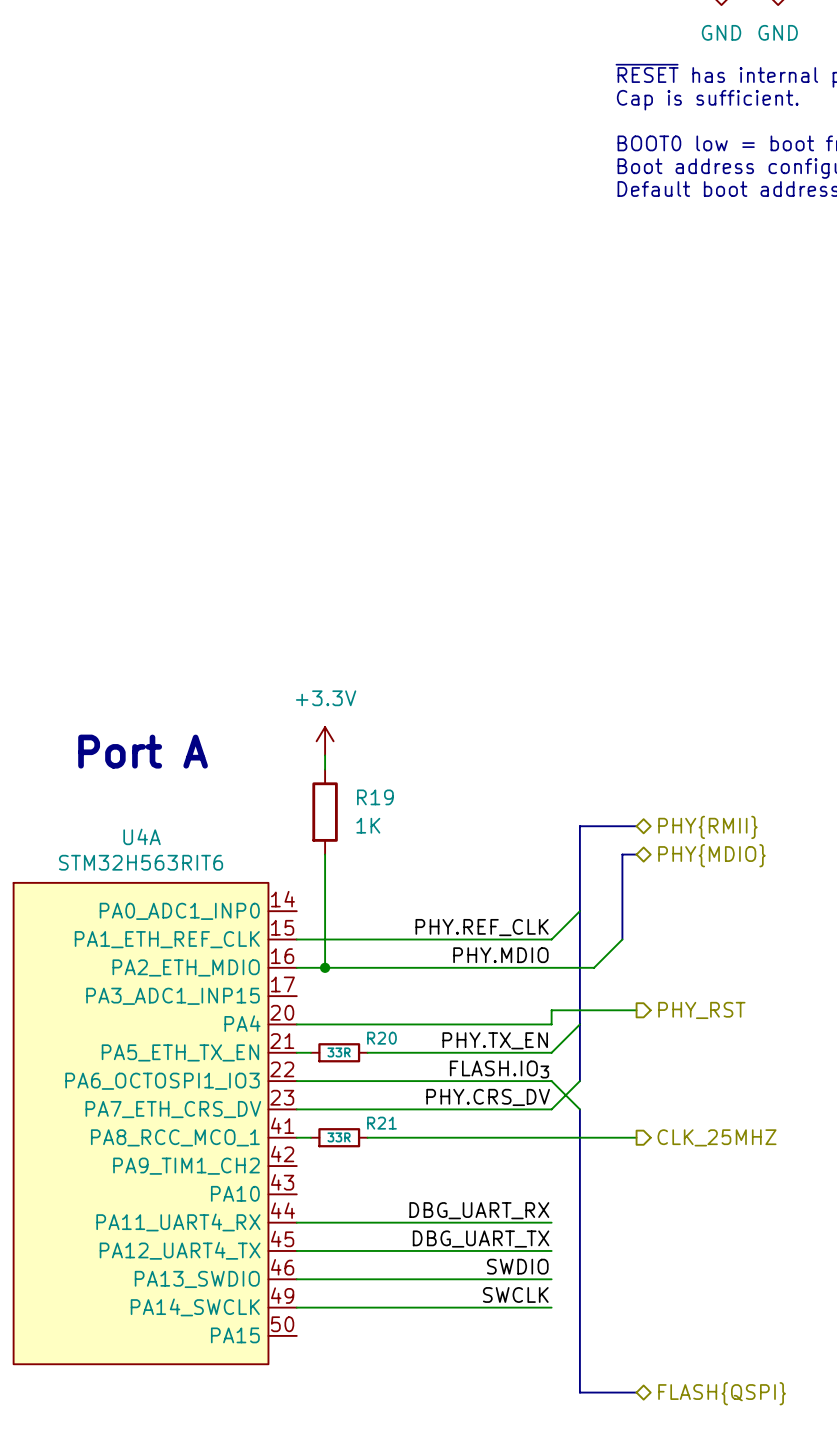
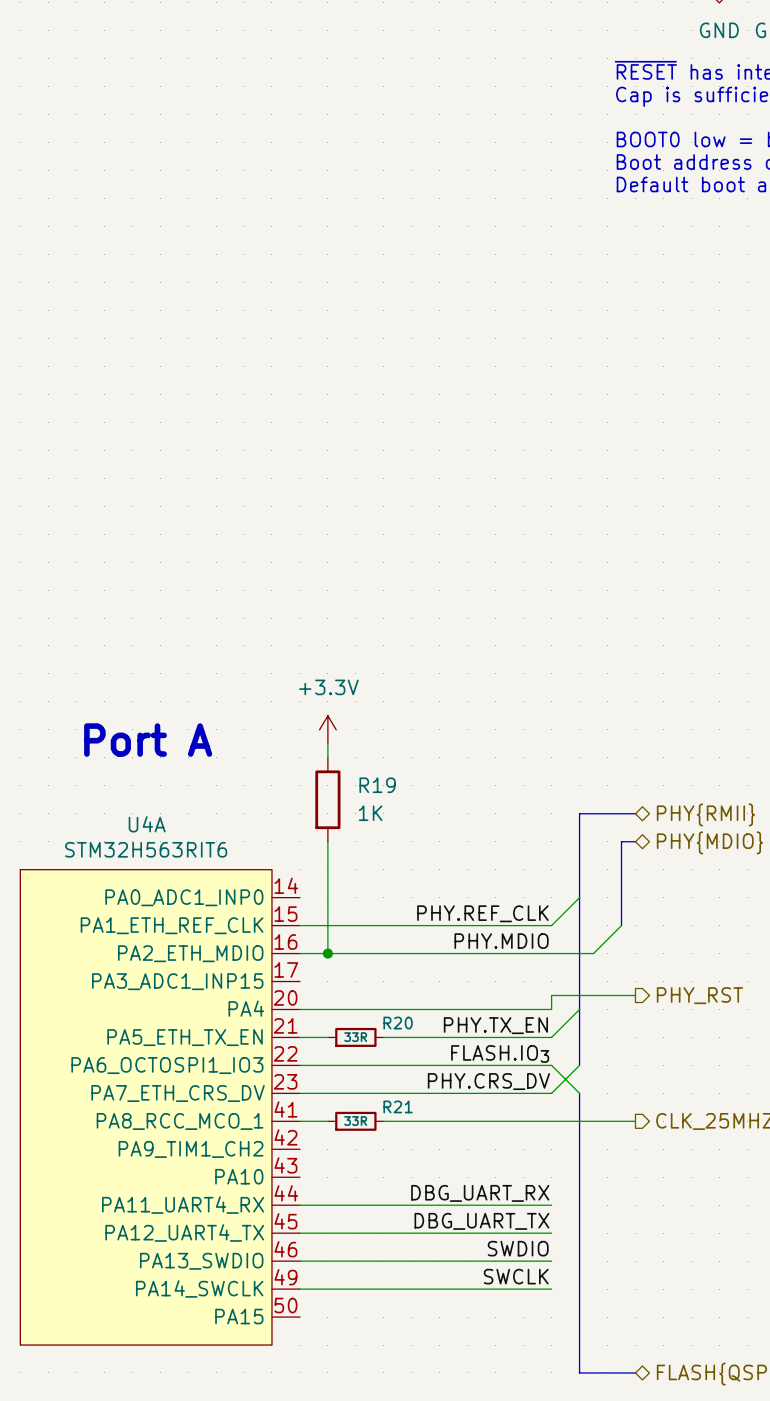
R20 position: (339, 1052) -> (355, 1037)
R21 position: (339, 1137) -> (355, 1121)

